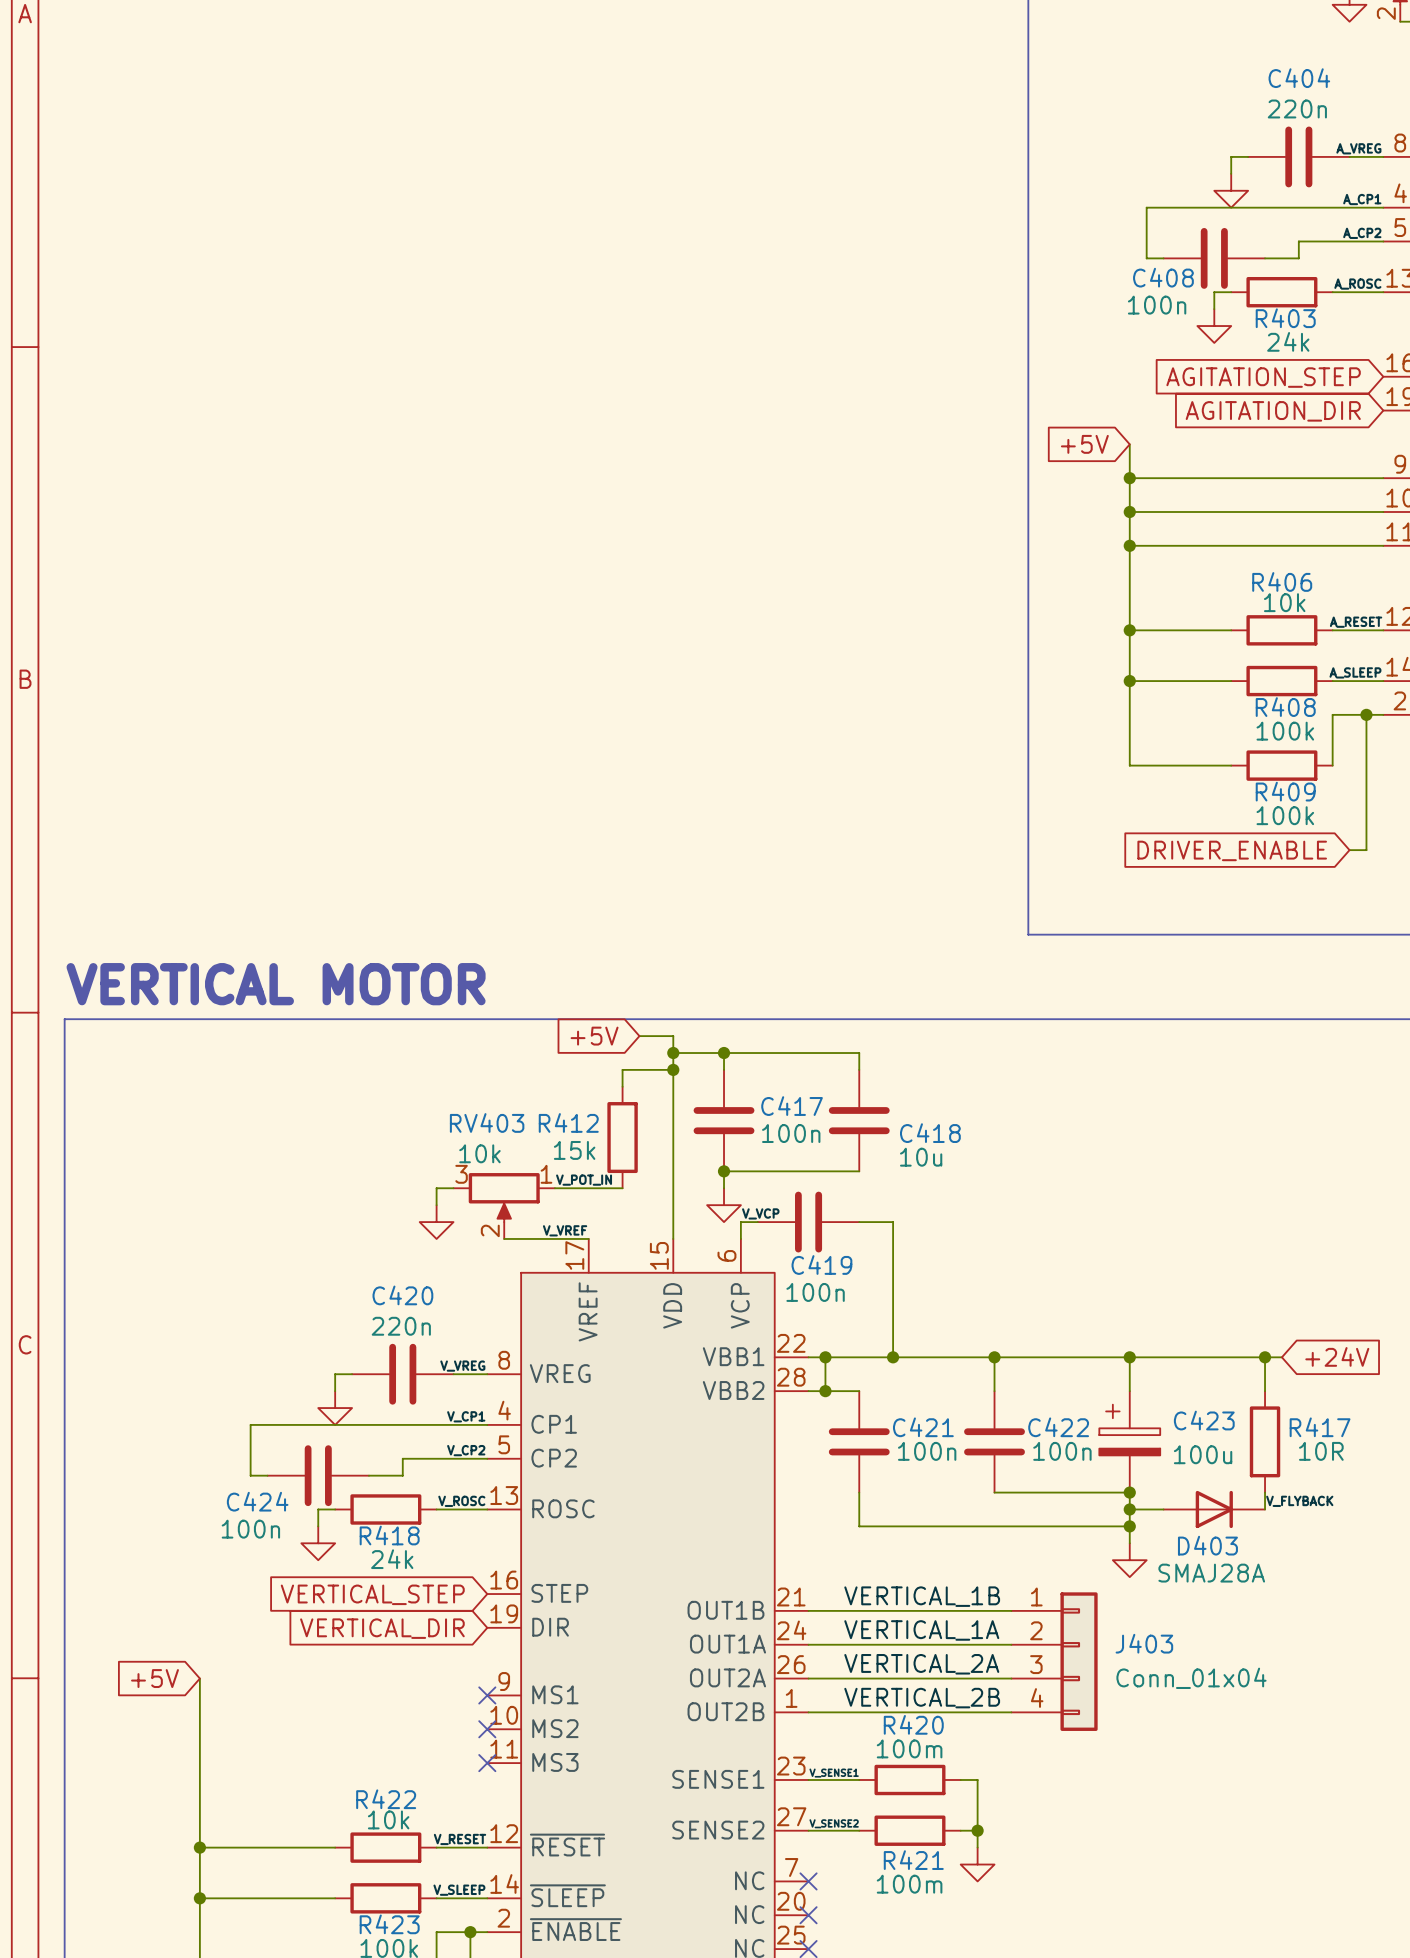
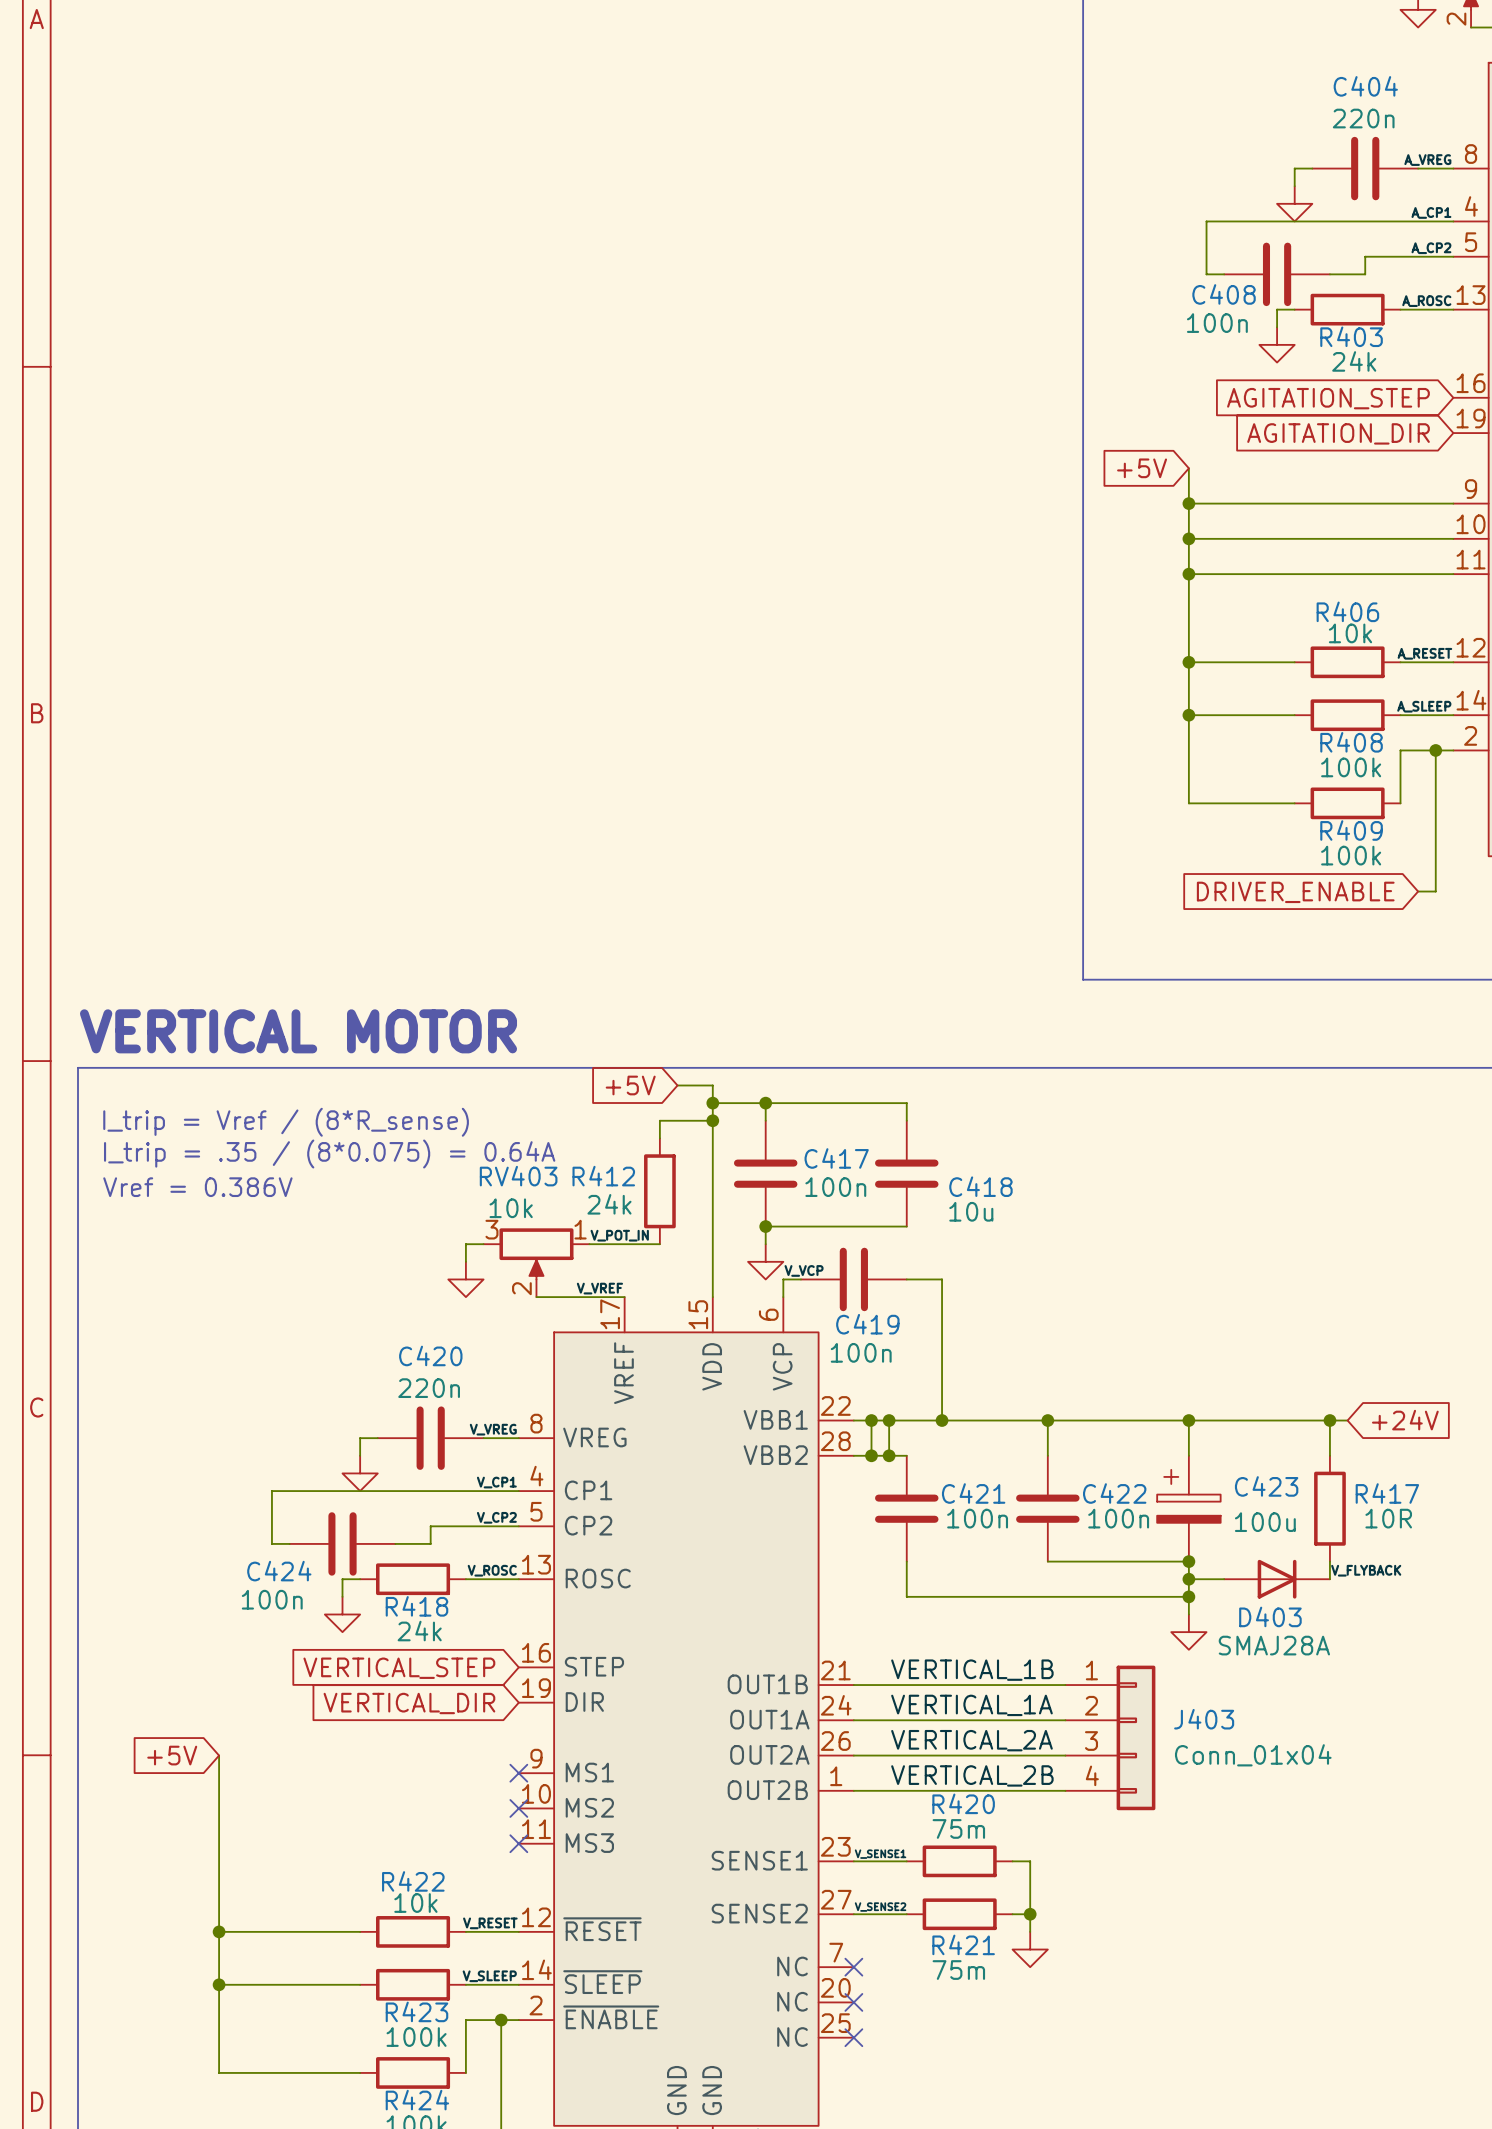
text: none -> I_trip = Vref / (8*R_sense) (286, 1122)
text: none -> I_trip = .35 / (8*0.075) = 0.64A (329, 1153)
text: none -> Vref = 0.386V (197, 1187)
R412 value: 15k (574, 1150) -> 24k (609, 1204)
wire: none -> (889, 1420) (889, 1455)
junction: none -> (889, 1420)
junction: none -> (889, 1455)
R420 value: 100m (909, 1748) -> 75m (958, 1828)
R421 value: 100m (909, 1884) -> 75m (958, 1970)

